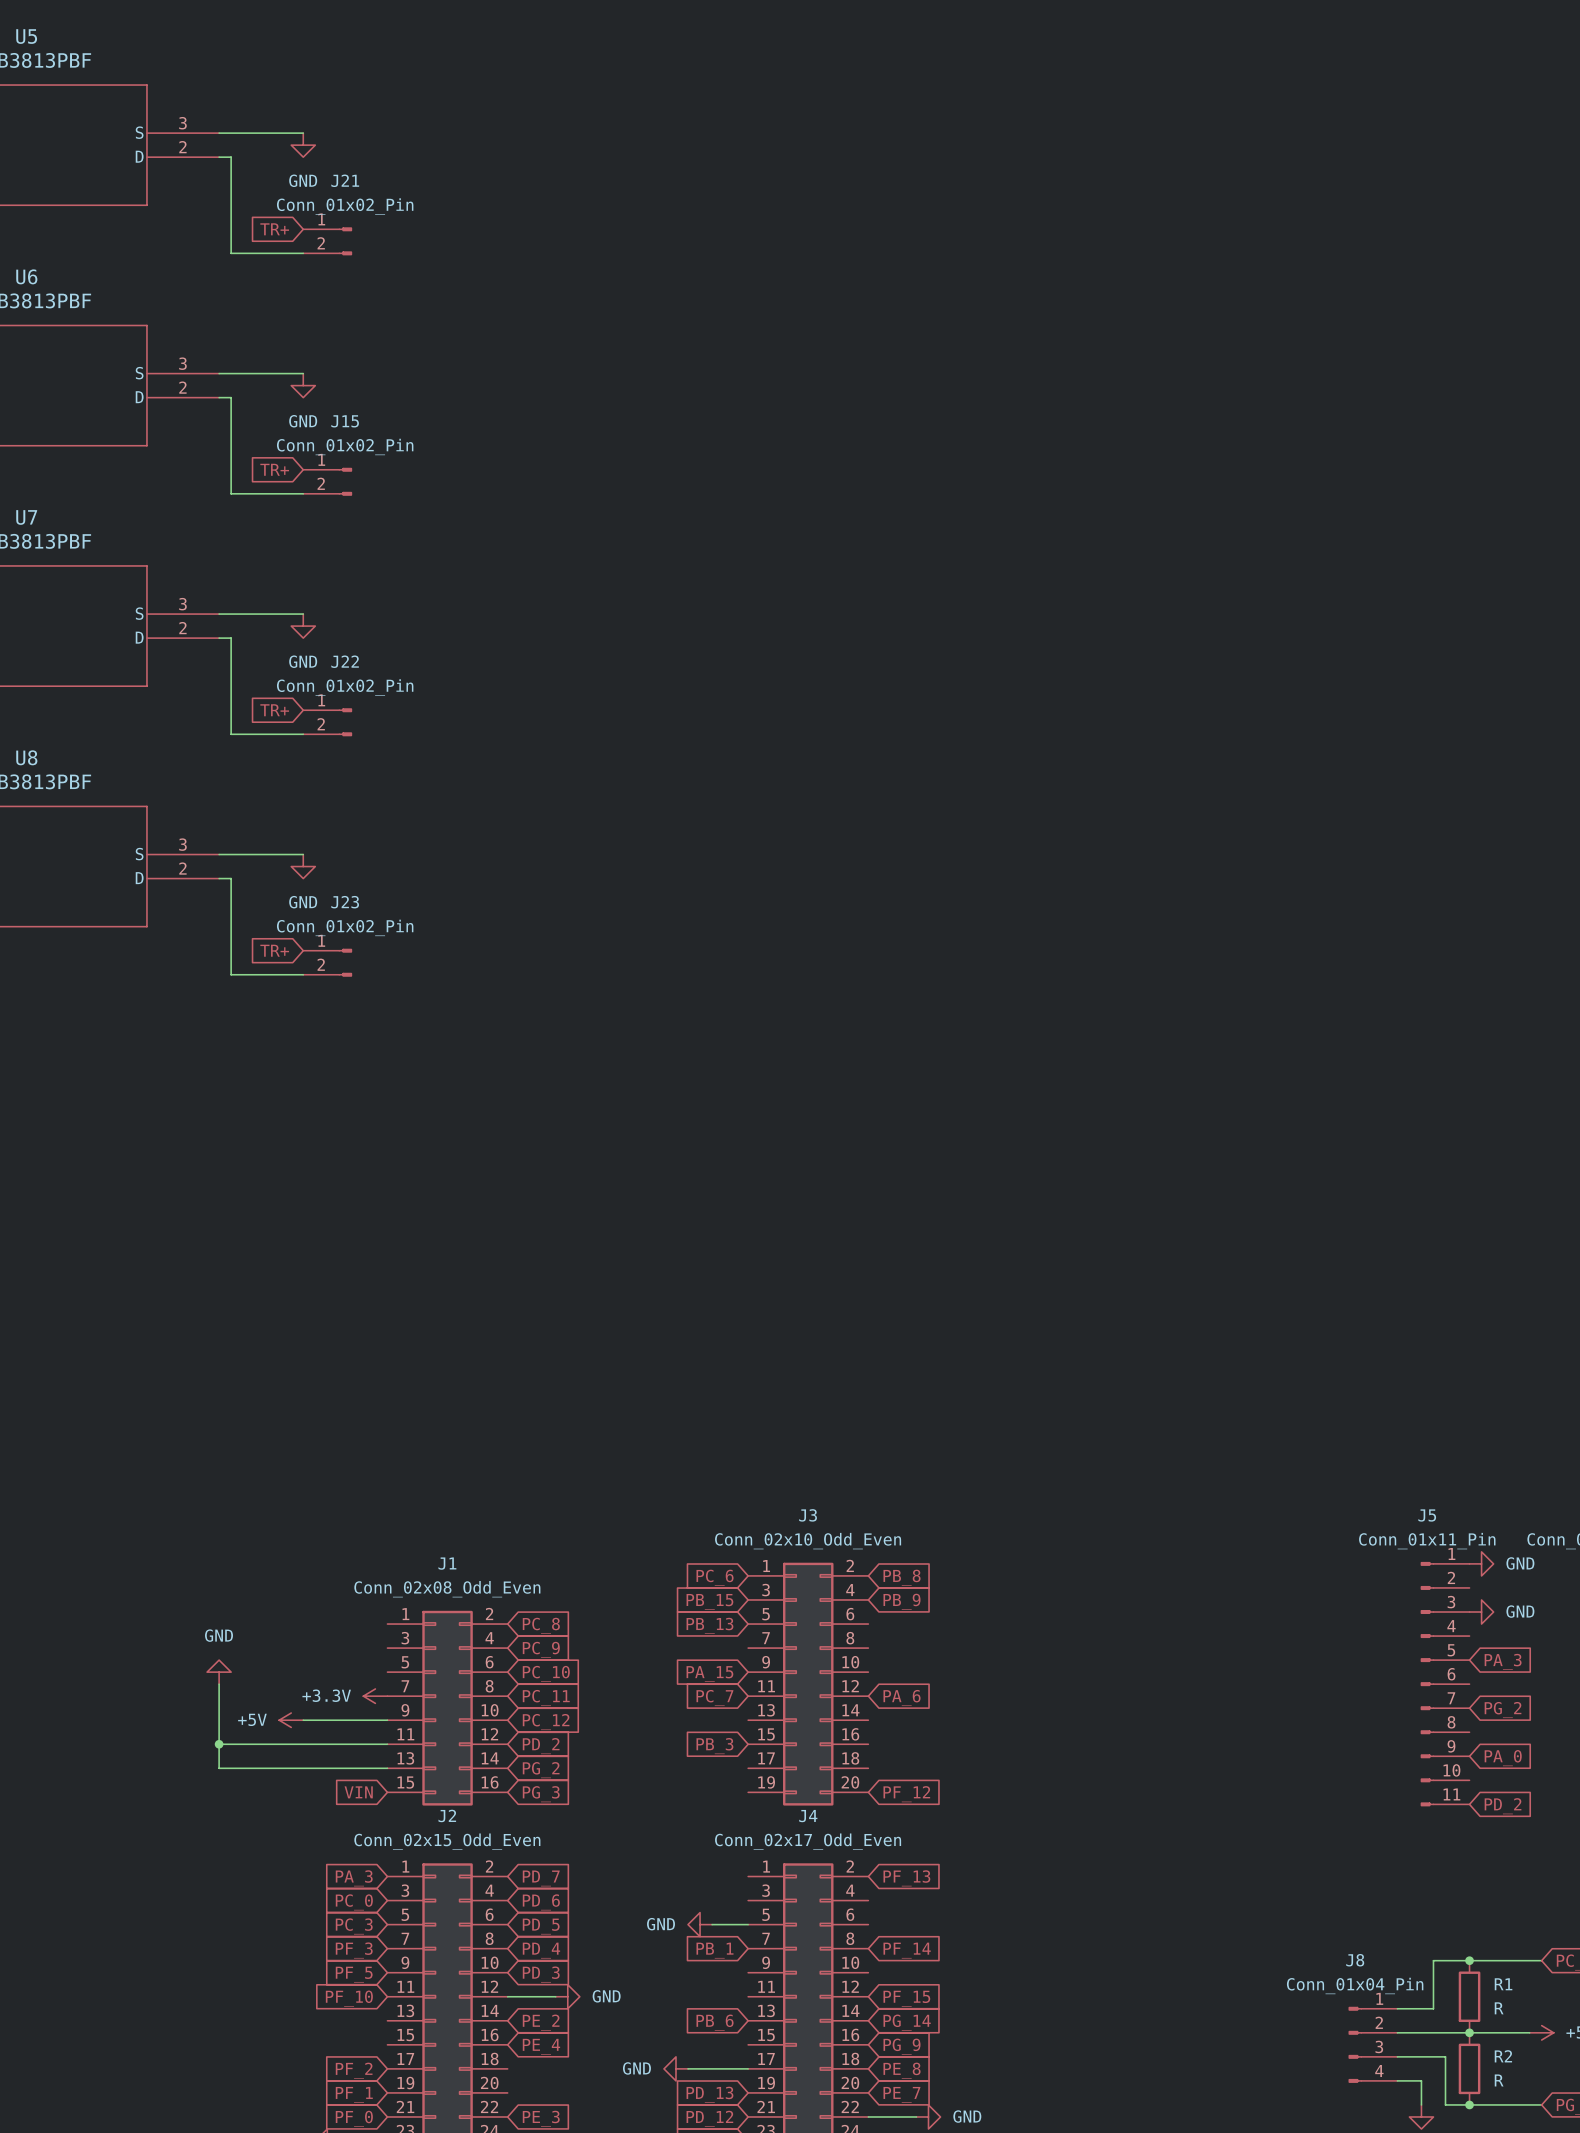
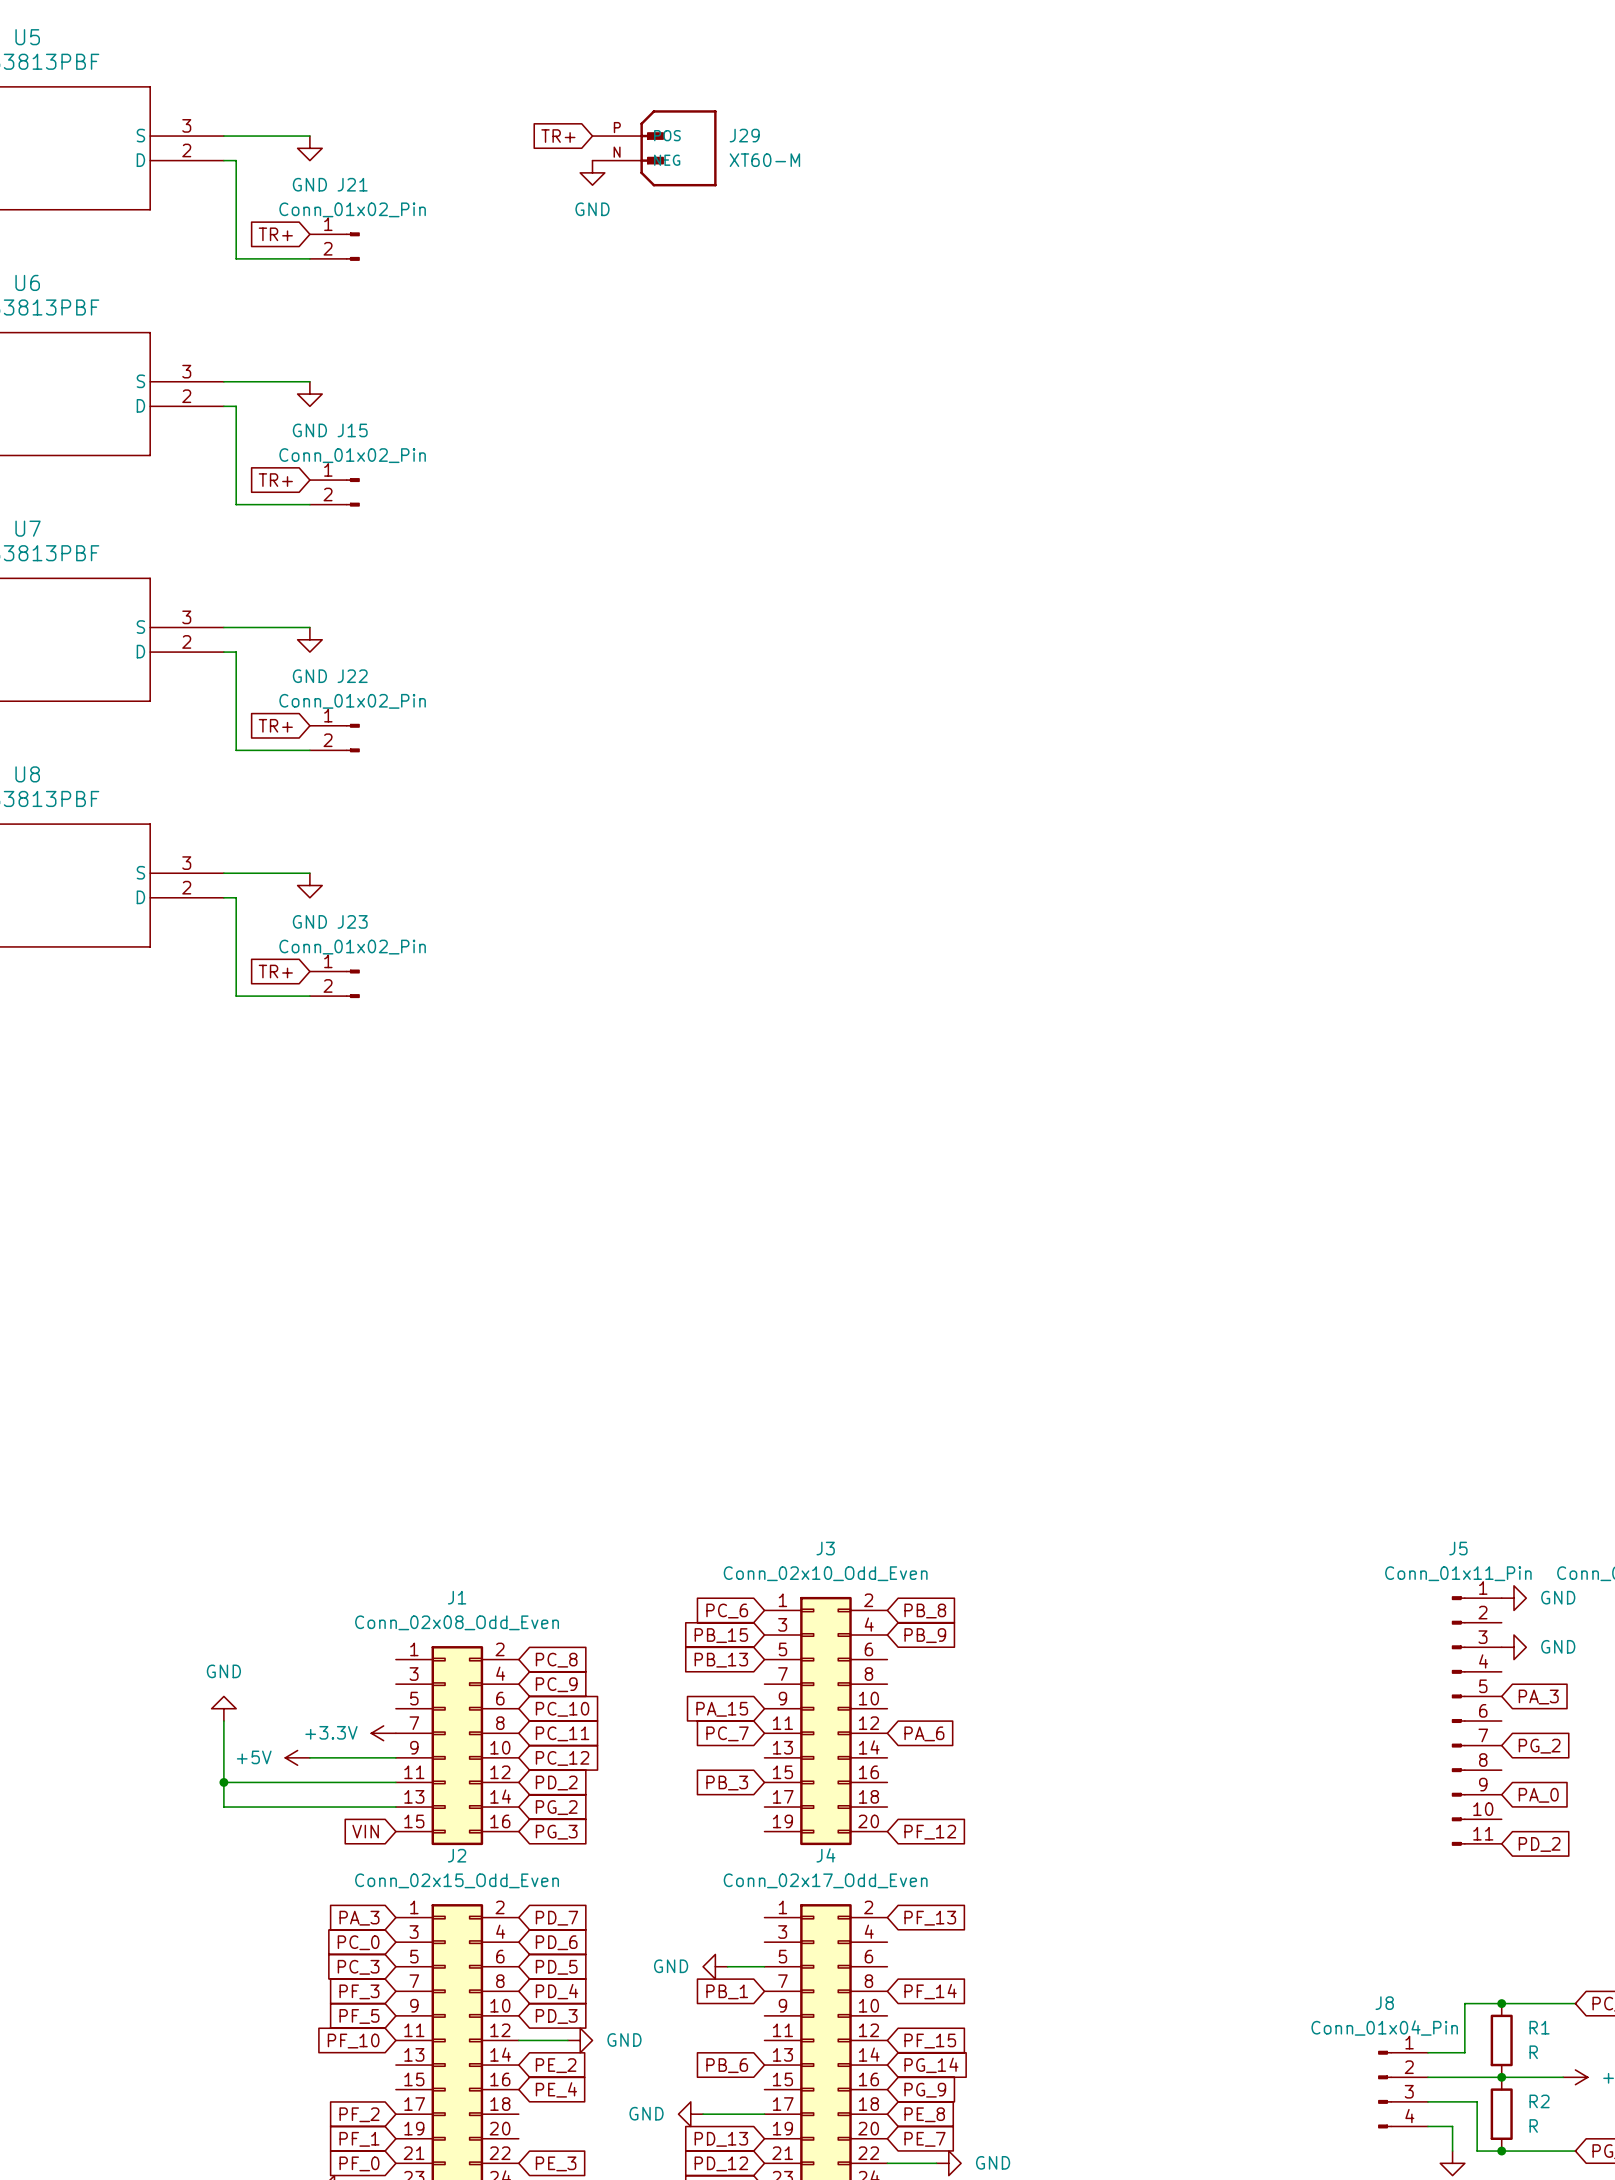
global label: none -> TR+ (558, 136)
J29: none -> XT60-M (654, 148)
power symbol: none -> GND (592, 172)

